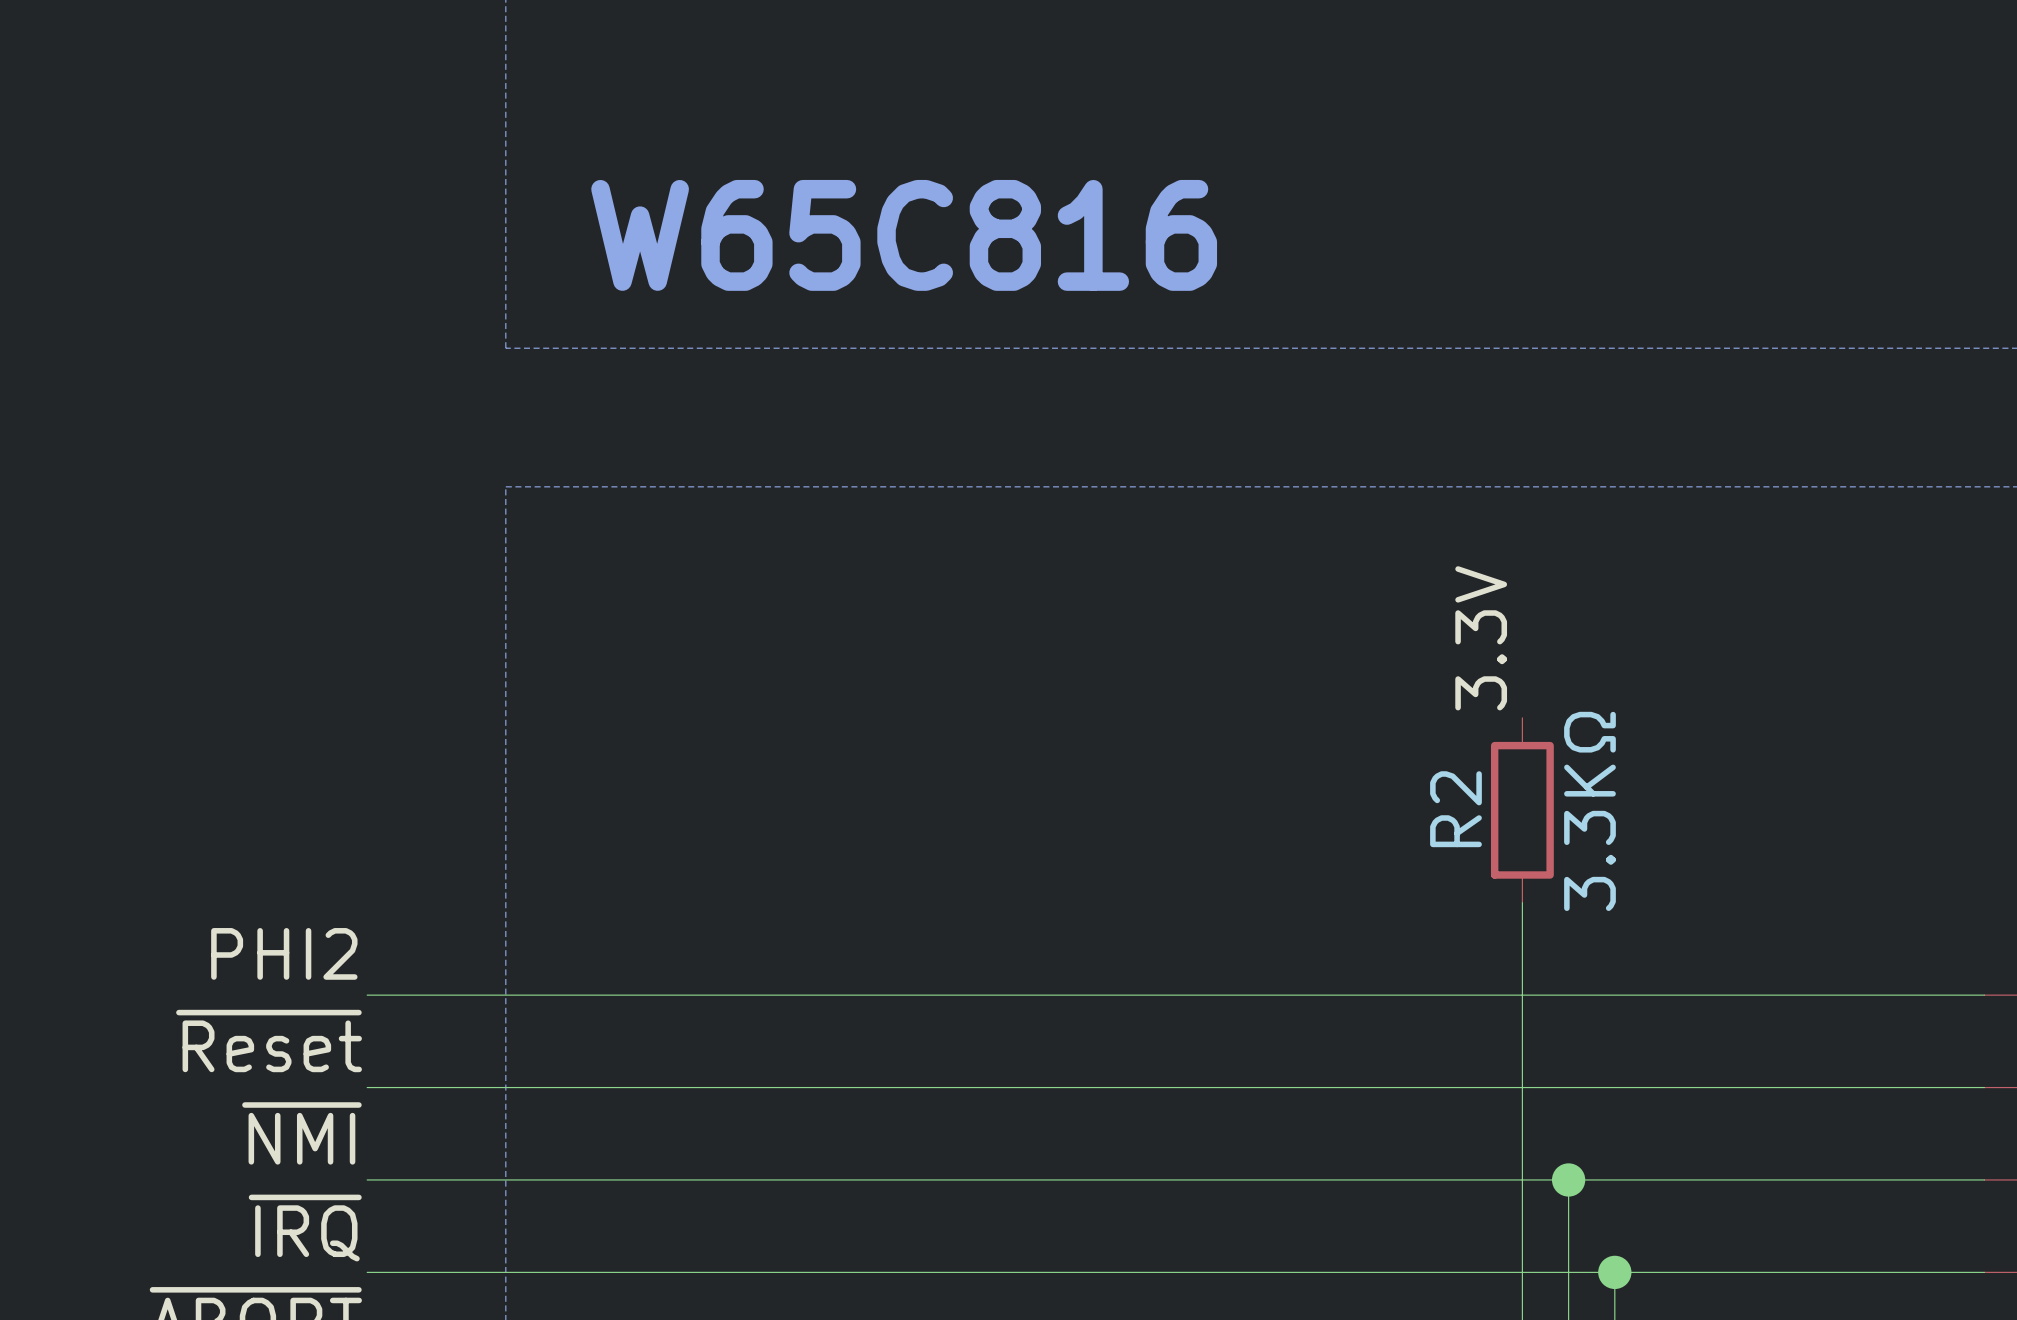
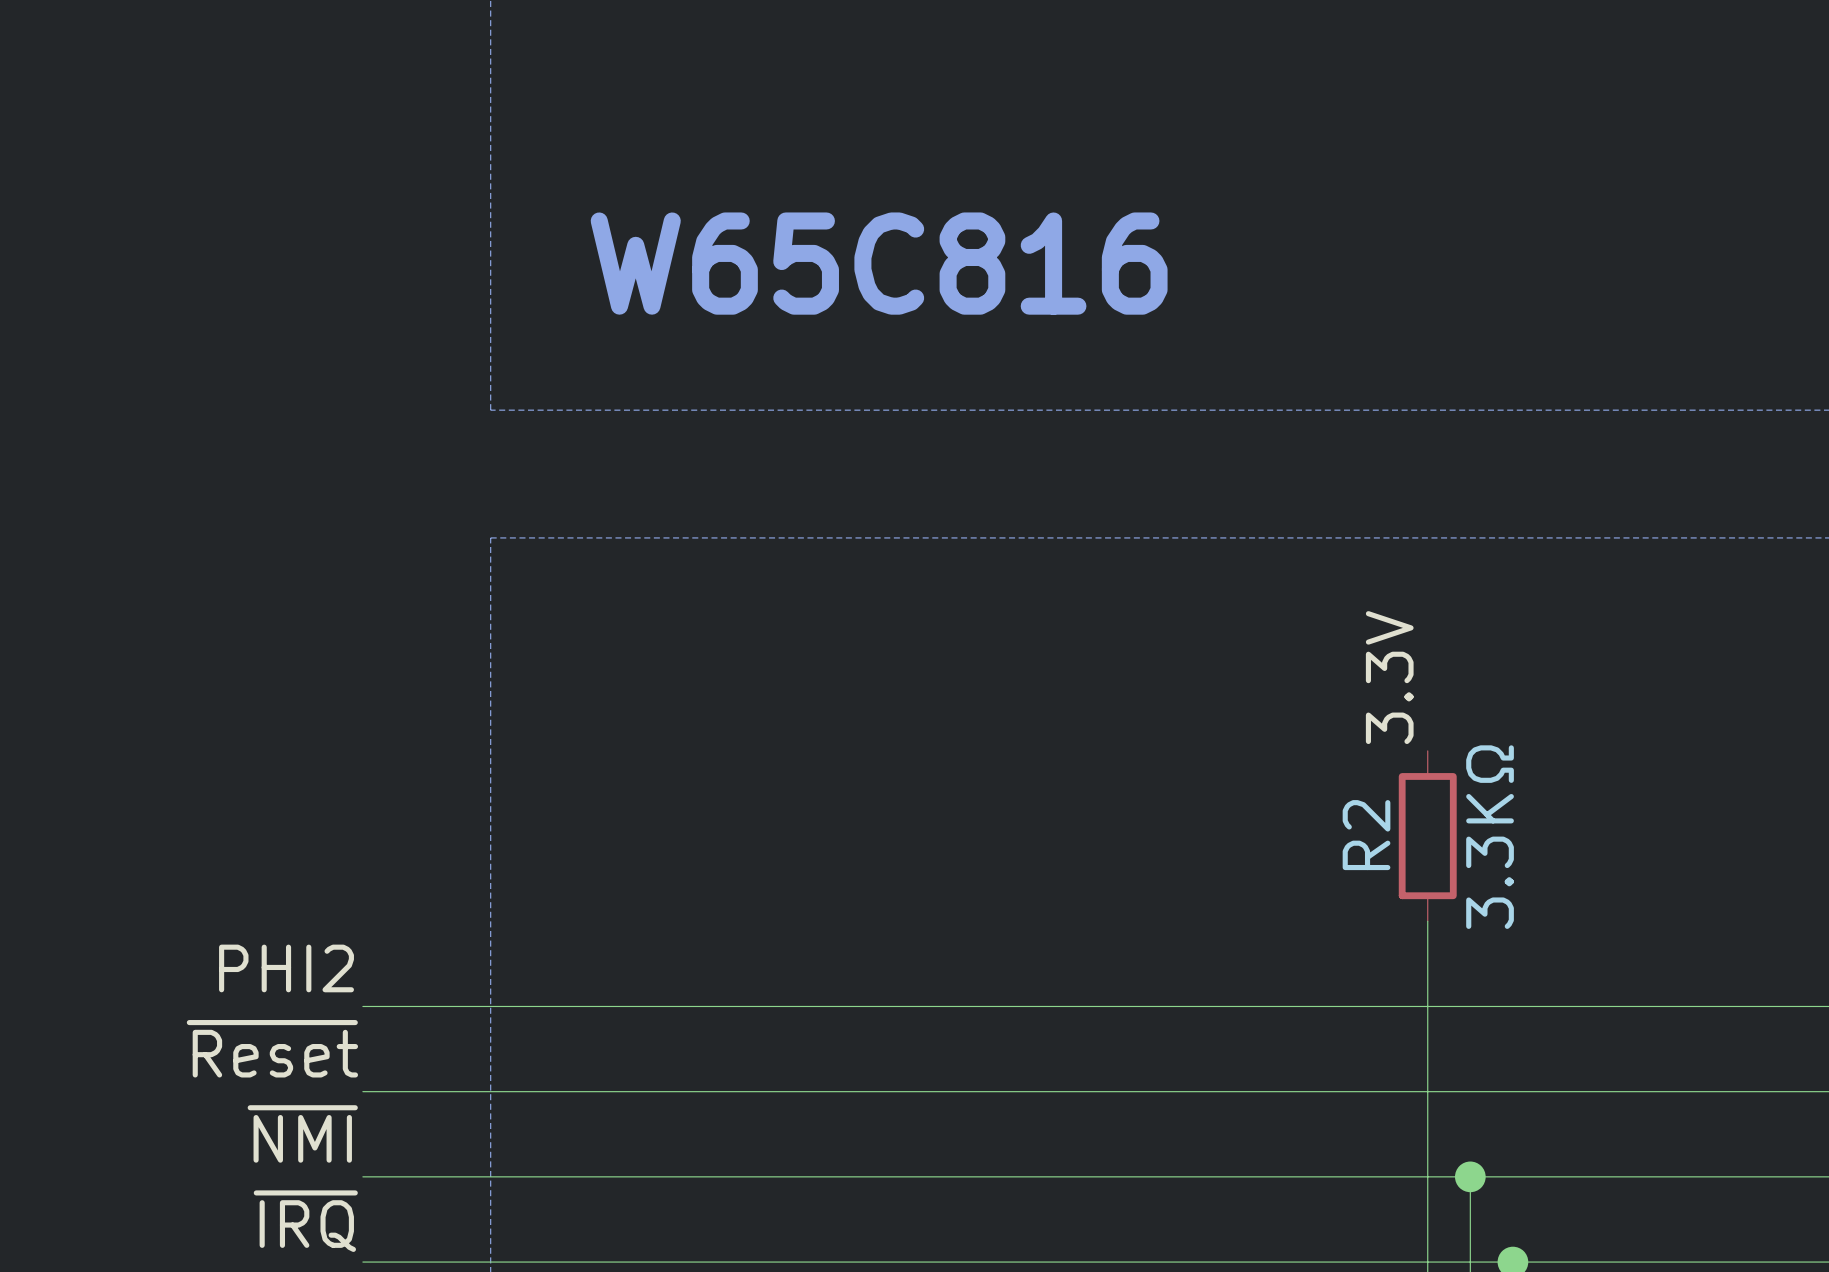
text position: W65C816 (904, 235) -> W65C816 (879, 263)

